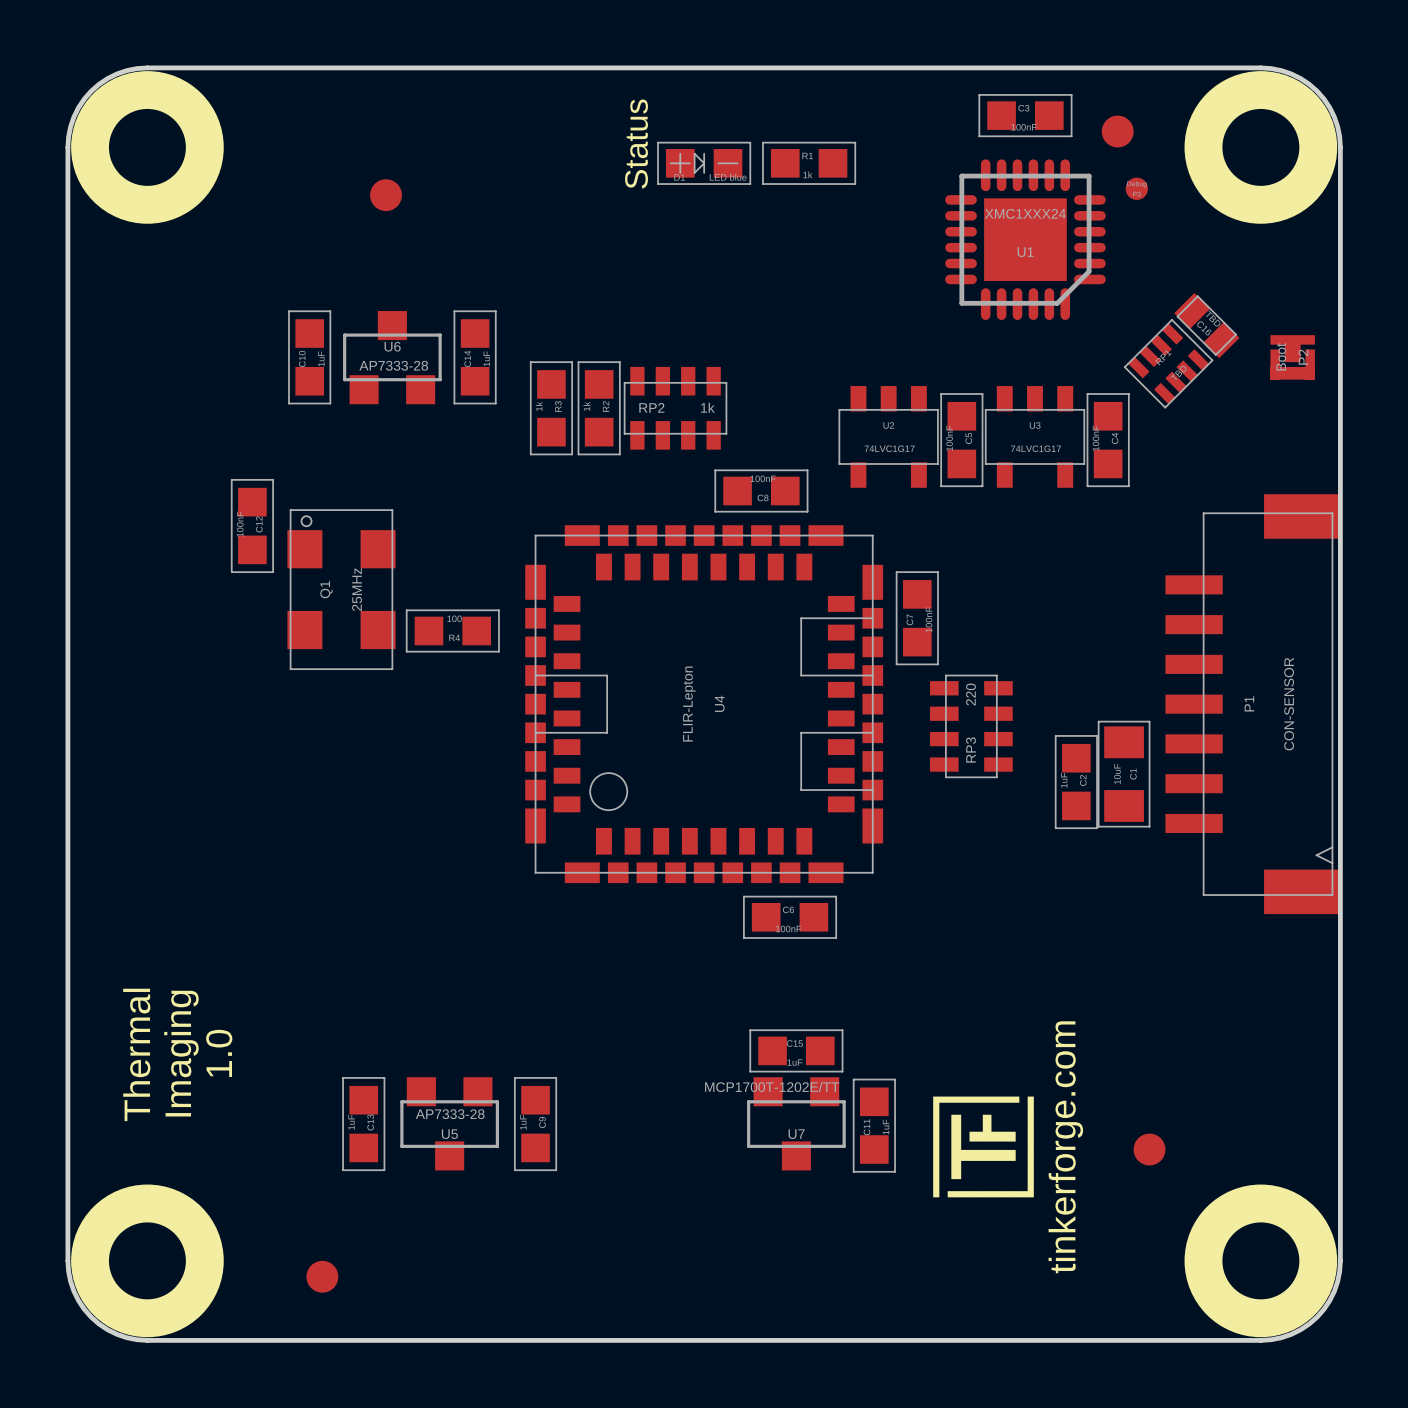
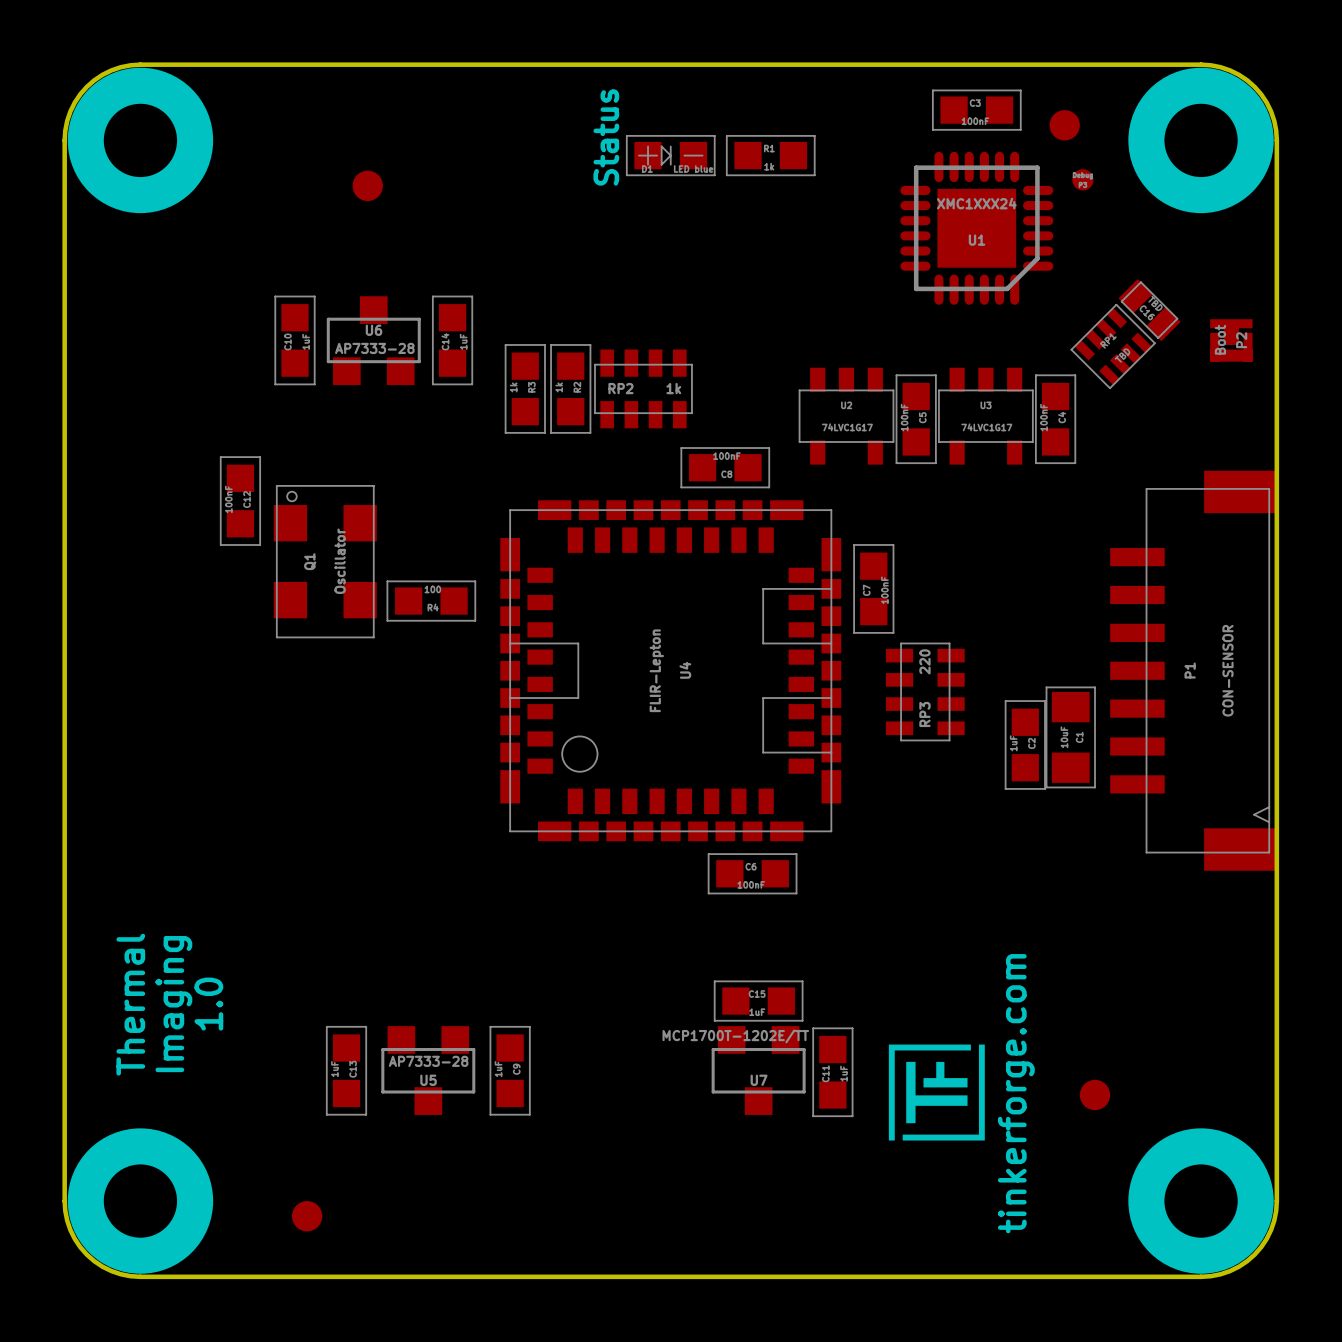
Q1 value: 25MHz (357, 589) -> Oscillator (340, 561)

